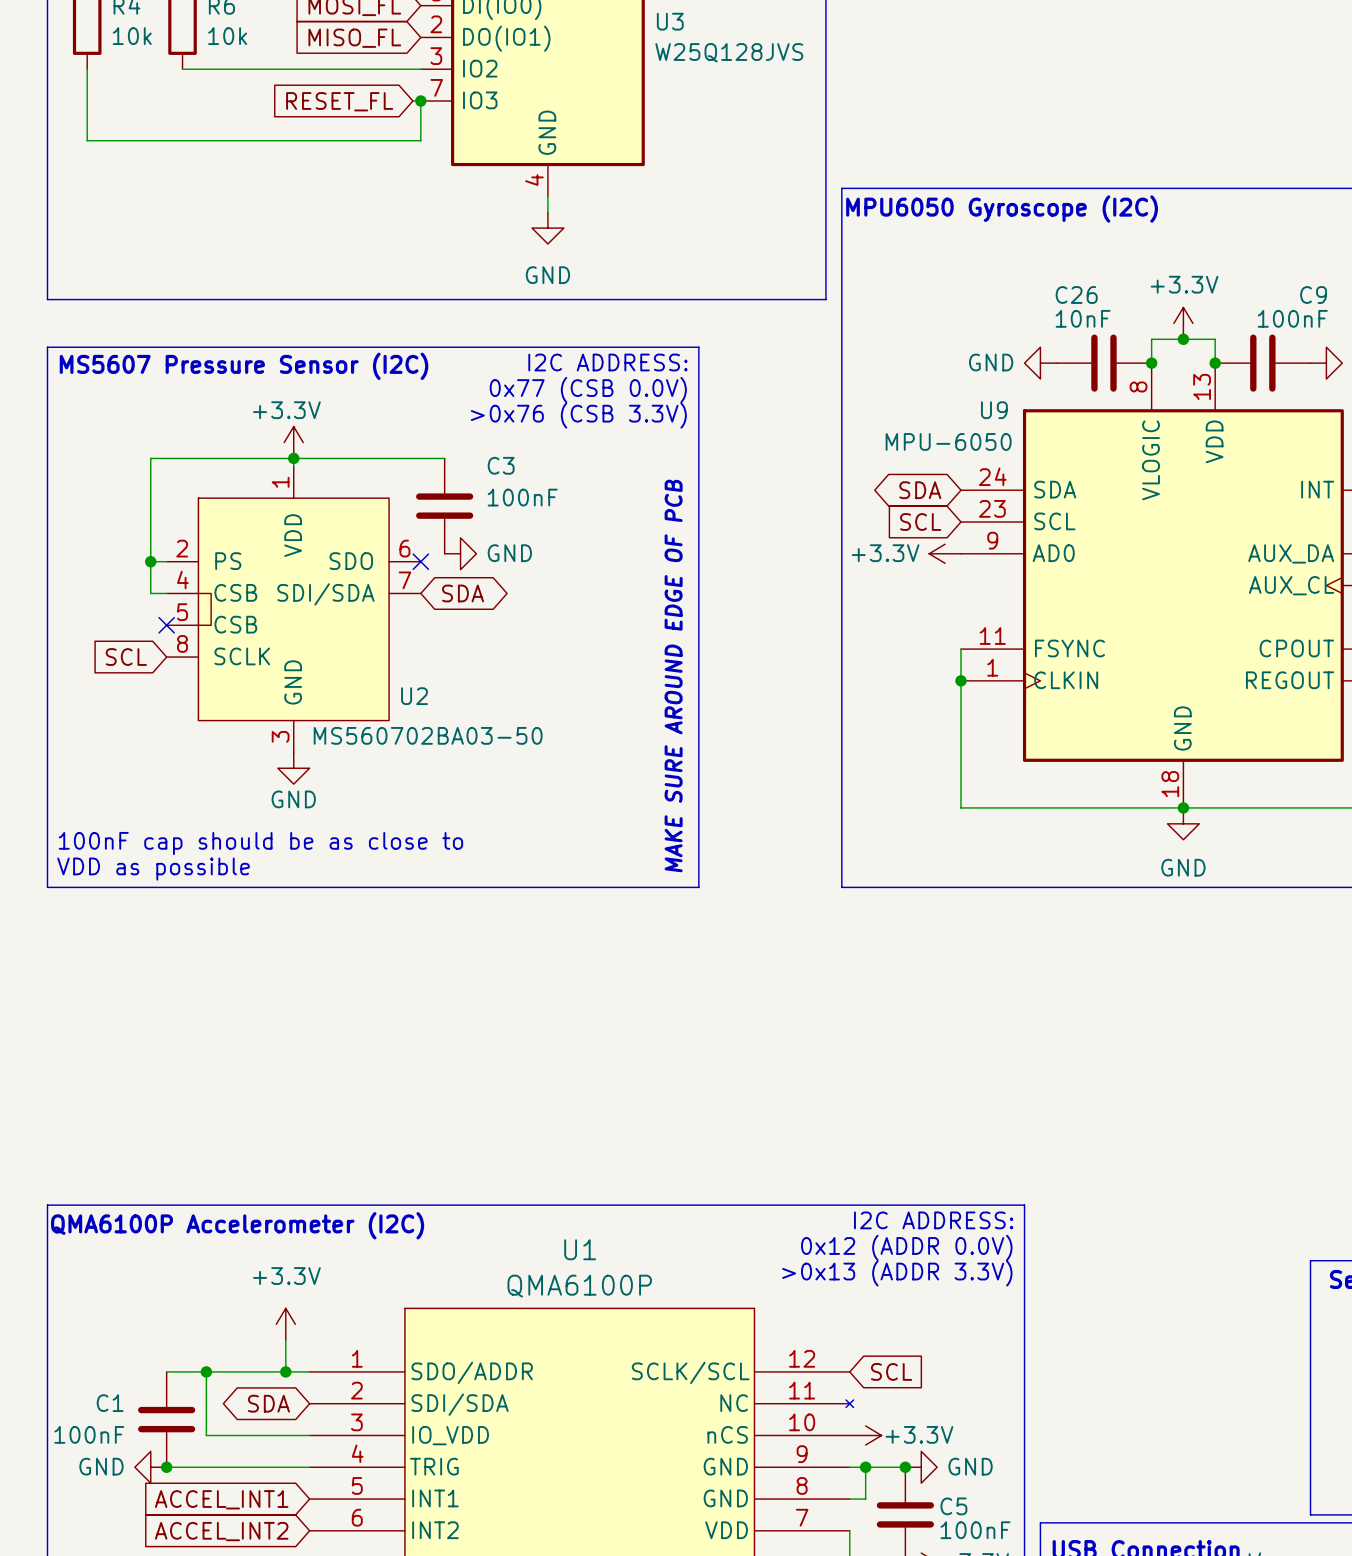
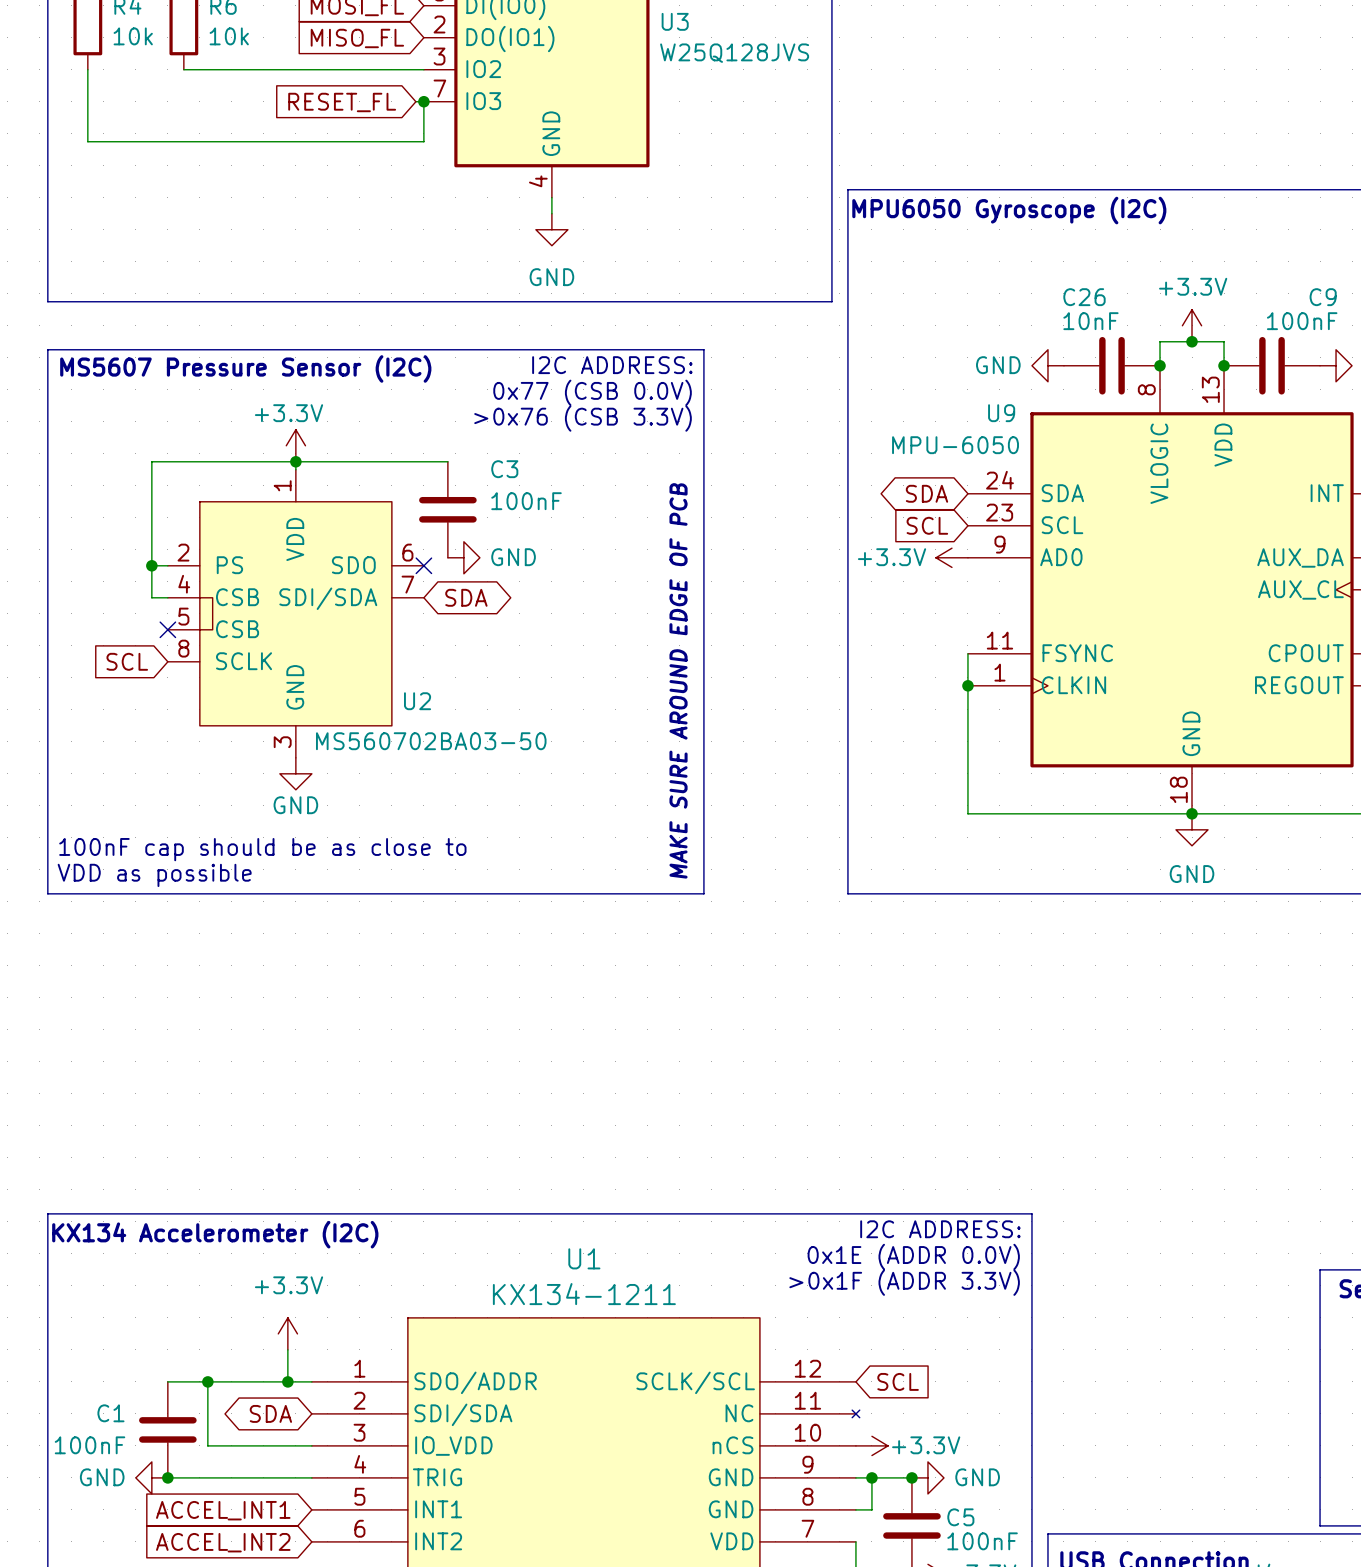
text: QMA6100P Accelerometer (I2C) (237, 1225) -> KX134 Accelerometer (I2C) (215, 1234)
text: 0x12 (ADDR 0.0V) (906, 1247) -> 0x1E (ADDR 0.0V) (913, 1256)
text: >0x13 (ADDR 3.3V) (897, 1273) -> >0x1F (ADDR 3.3V) (904, 1282)
U1 value: QMA6100P (579, 1286) -> KX134-1211 (584, 1294)

